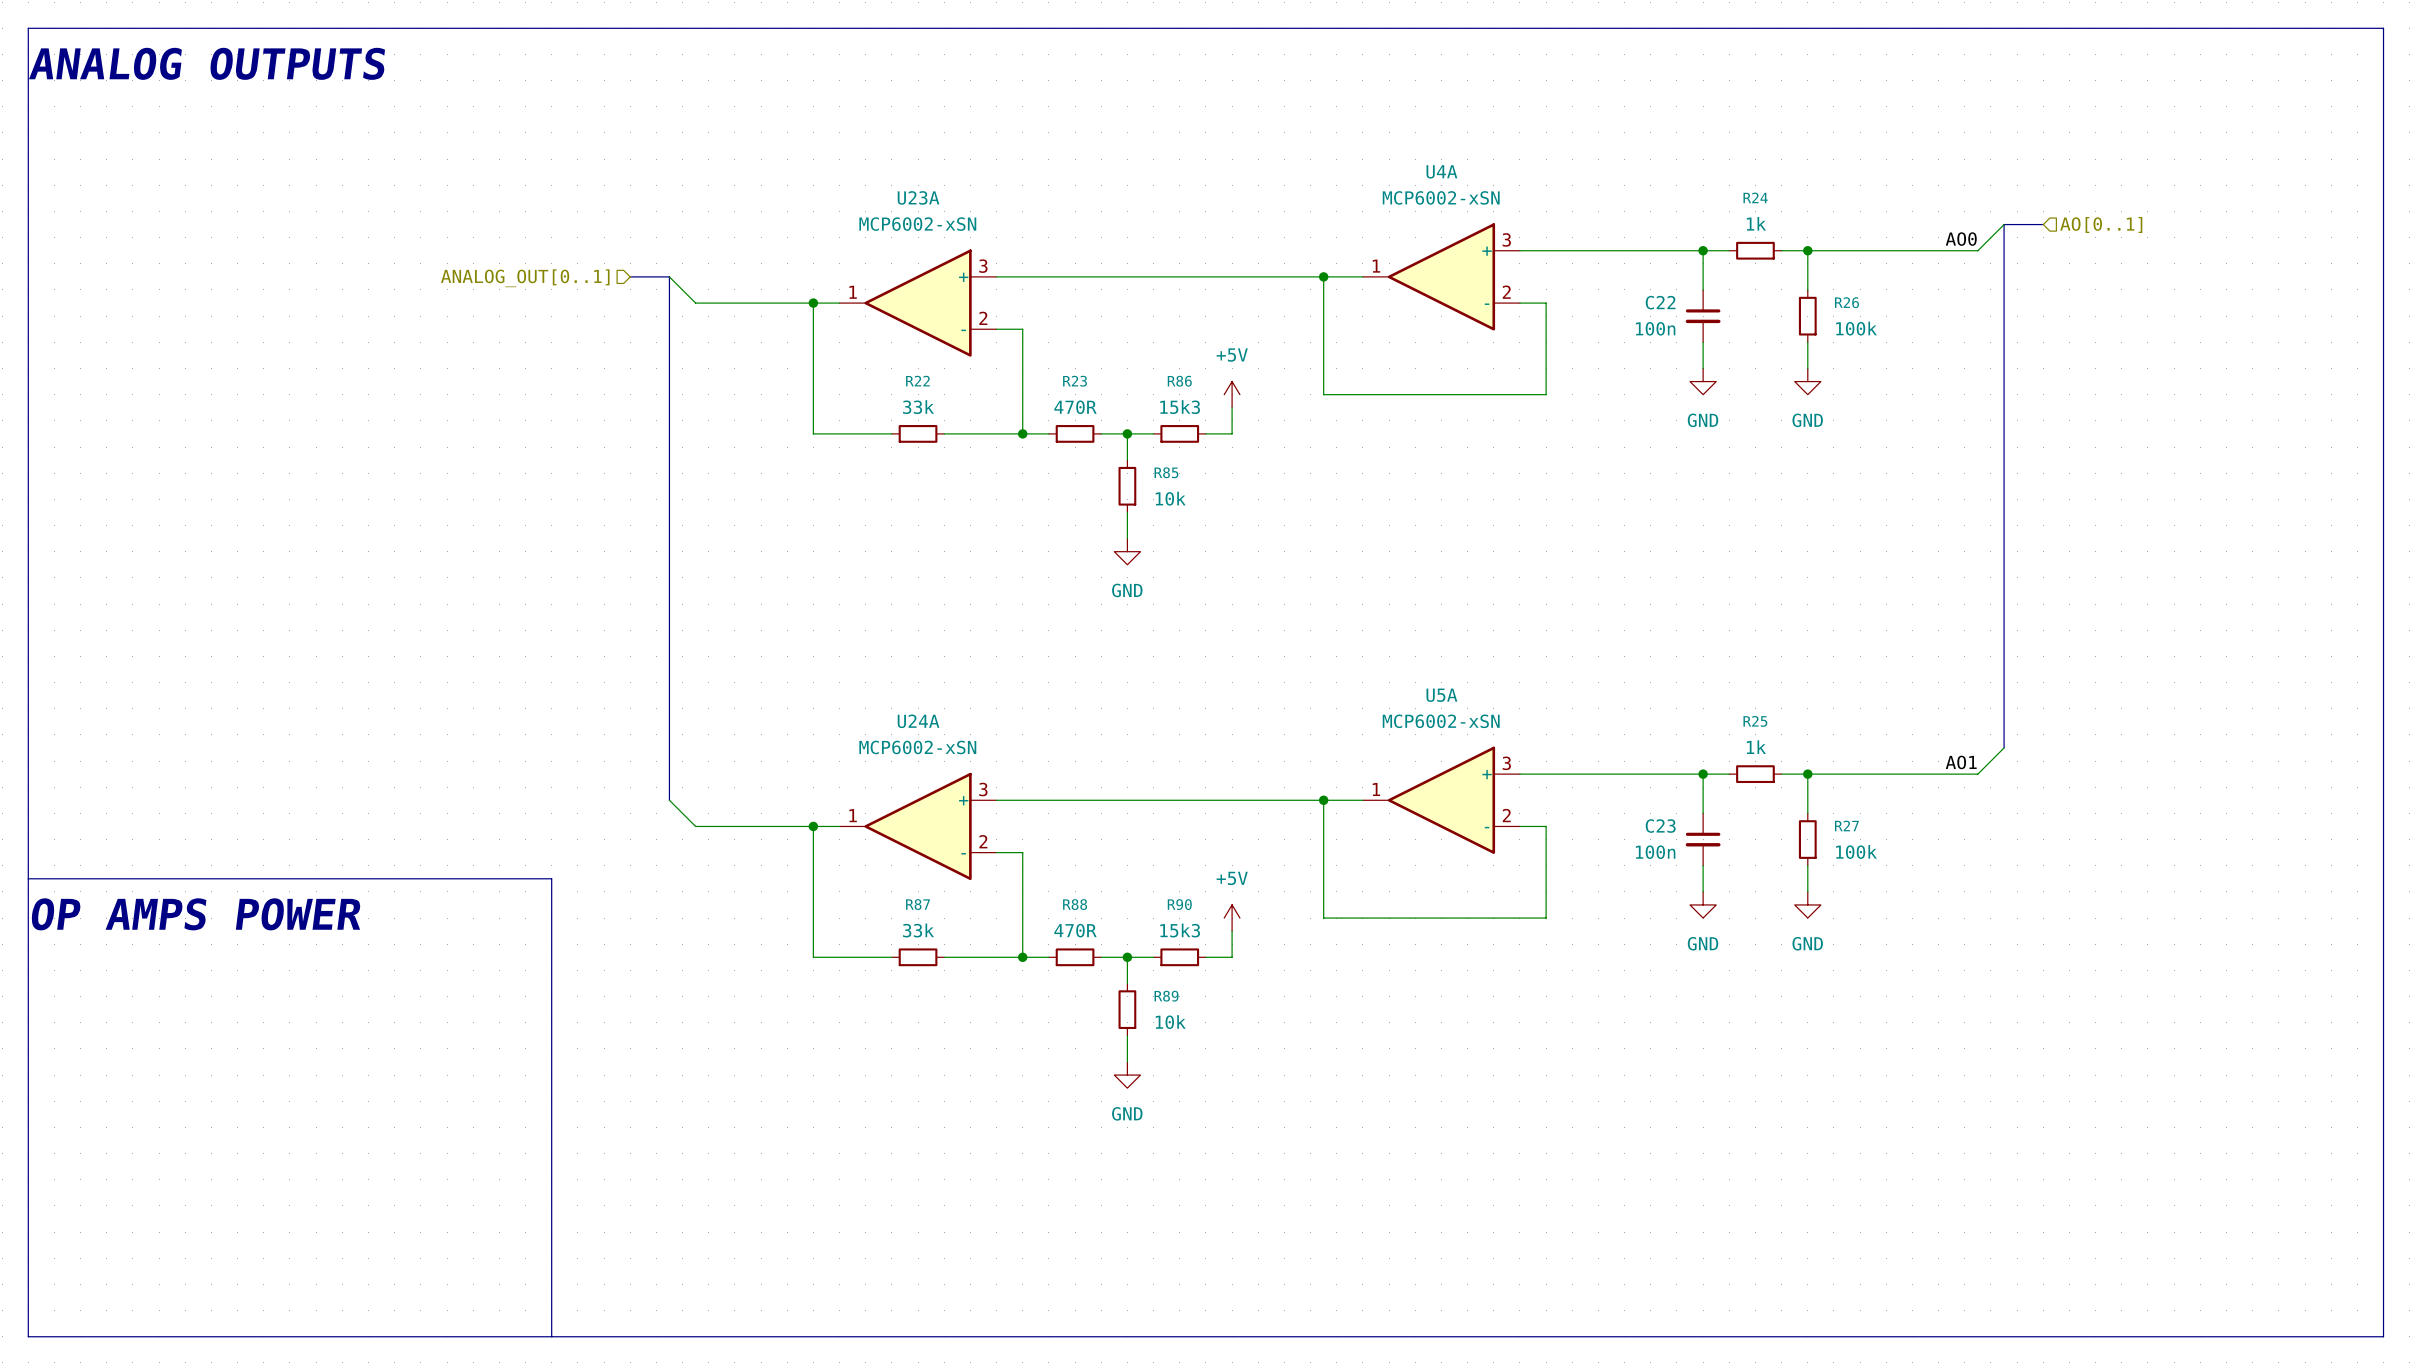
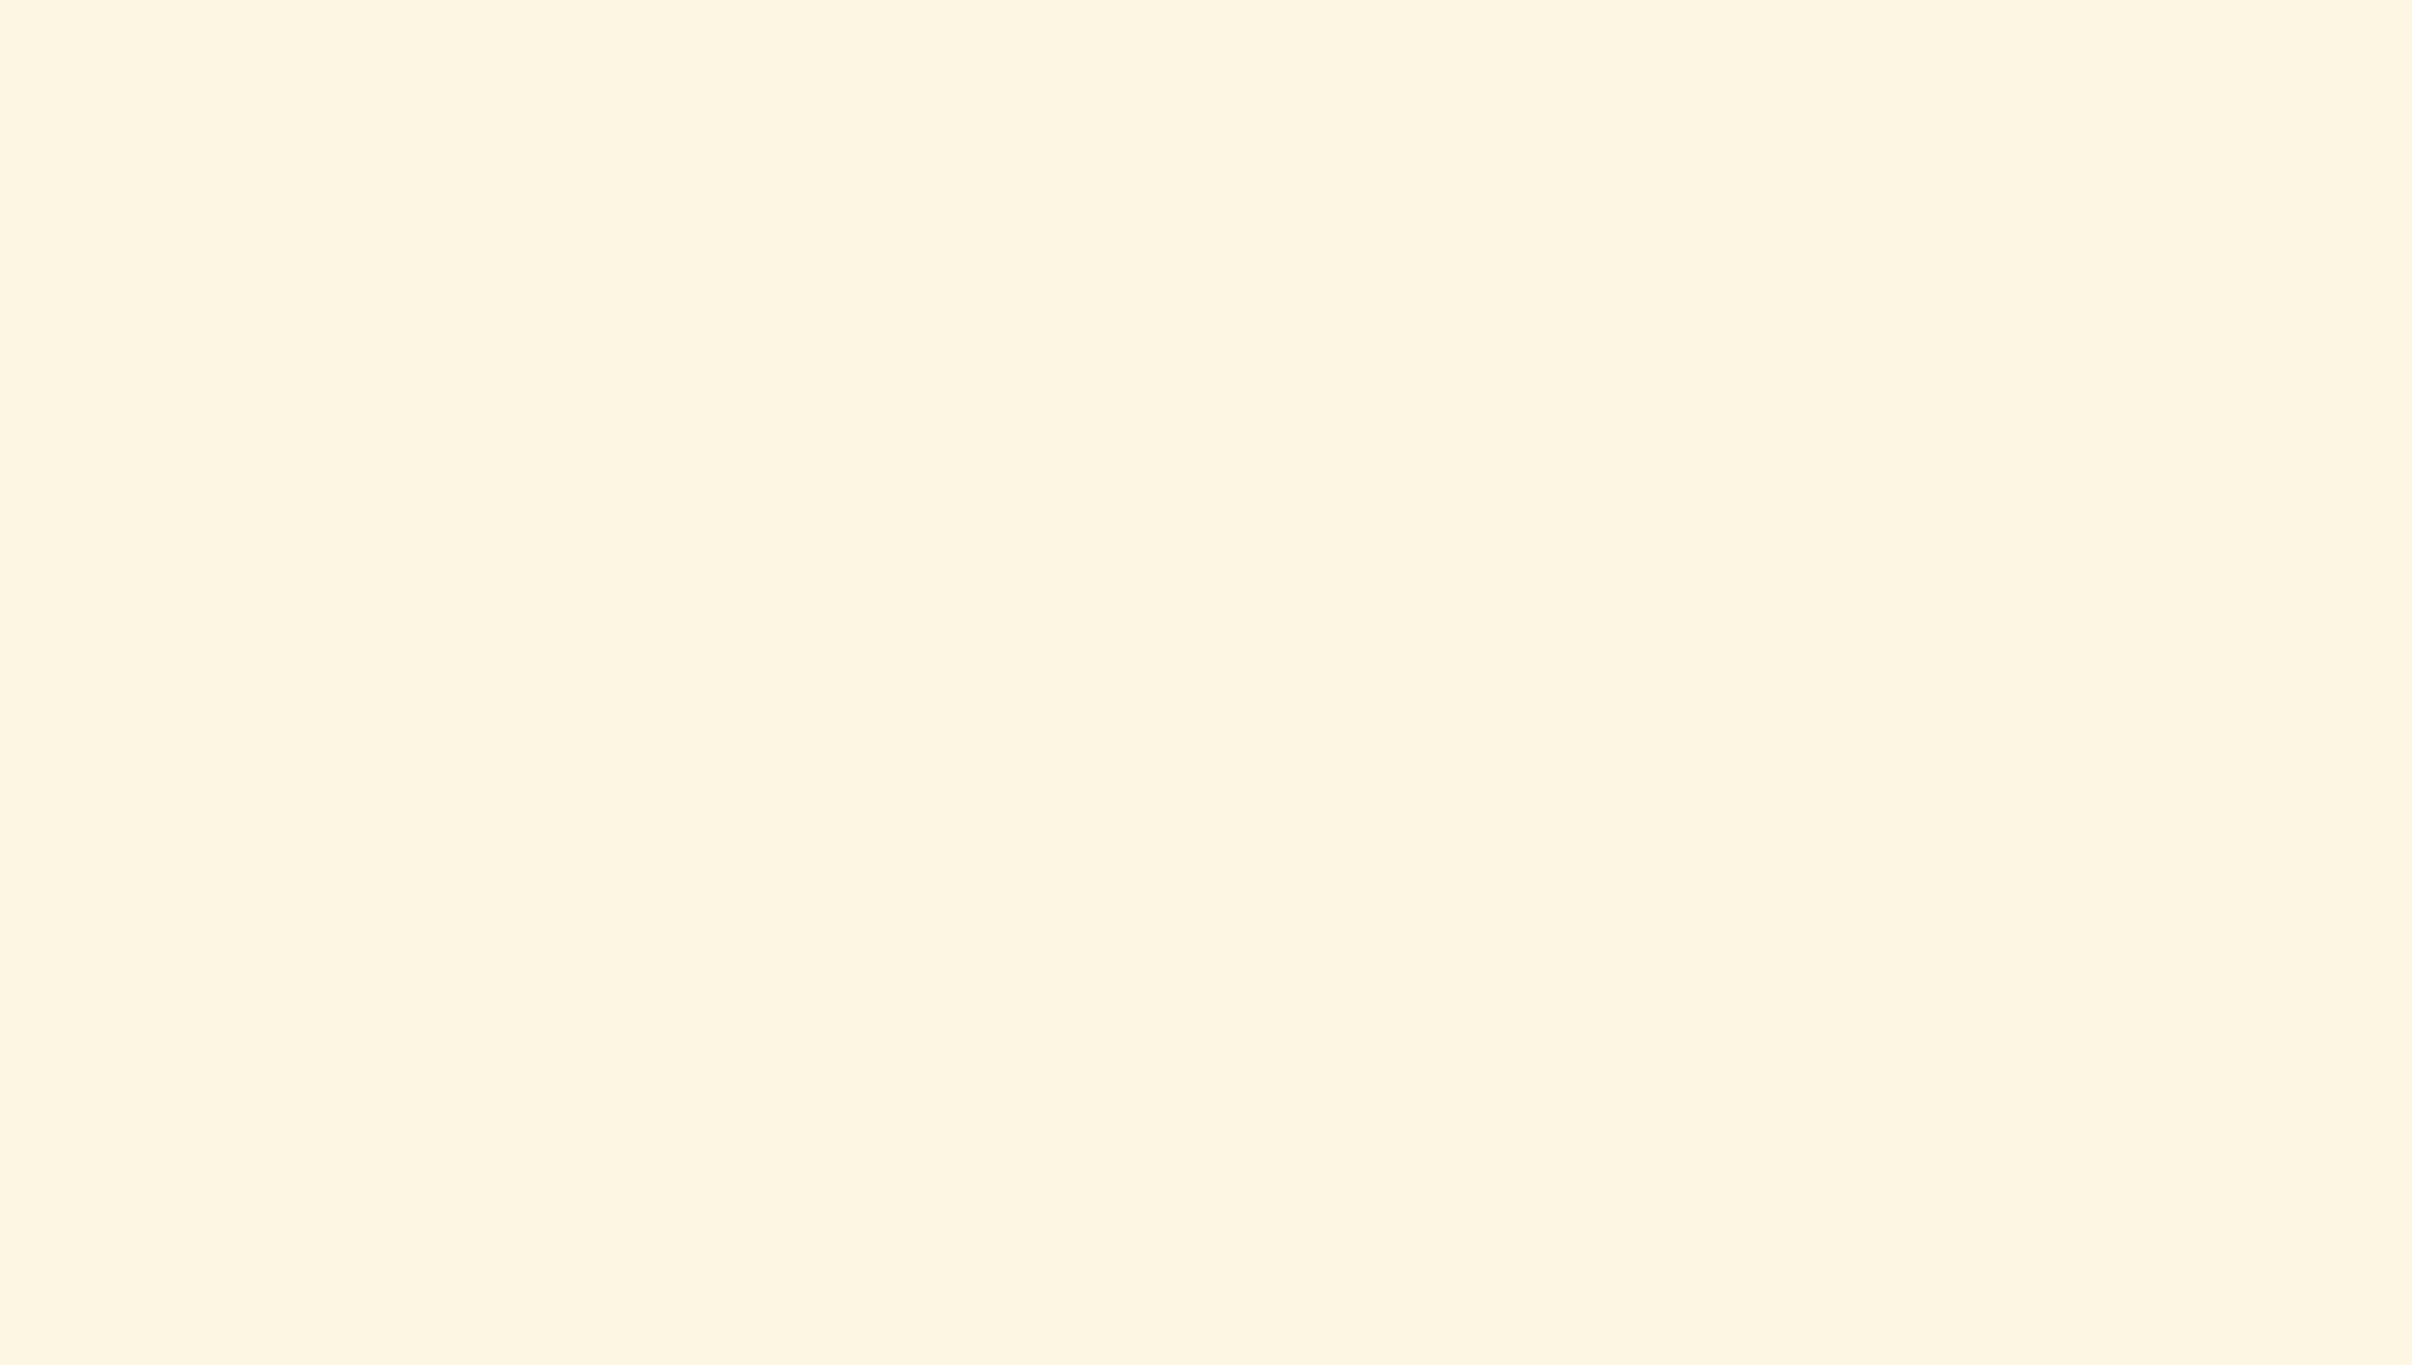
line: (28, 28) (2383, 28) (2383, 1336) (28, 1336) (28, 28) -> none
text: ANALOG OUTPUTS (207, 63) -> none
wire: (2004, 224) (1977, 250) (1781, 250) -> none
bus: (2043, 224) (2004, 224) (2004, 747) -> none
hierarchical label: AO[0..1] (2101, 224) -> none
label: AO0 (1961, 239) -> none
wire: (1519, 250) (1729, 250) -> none
wire: (1703, 250) (1703, 289) -> none
junction: (1703, 250) -> none
R24: 1k (1755, 250) -> none
wire: (1807, 250) (1807, 289) -> none
junction: (1807, 250) -> none
bus: (630, 276) (669, 276) (669, 800) -> none
wire: (669, 276) (695, 303) (839, 303) -> none
wire: (996, 276) (1362, 276) -> none
wire: (1323, 276) (1323, 394) (1546, 394) (1546, 303) (1519, 303) -> none
junction: (1323, 276) -> none
U4A: MCP6002-xSN (1441, 276) -> none
hierarchical label: ANALOG_OUT[0..1] (525, 278) -> none
wire: (813, 303) (813, 433) (891, 433) -> none
junction: (813, 303) -> none
U23A: MCP6002-xSN (918, 303) -> none
C22: 100n (1703, 316) -> none
R26: 100k (1807, 316) -> none
wire: (996, 329) (1022, 329) (1022, 433) -> none
wire: (1703, 342) (1703, 368) -> none
wire: (1807, 342) (1807, 368) -> none
power symbol: GND (1703, 381) -> none
power symbol: GND (1807, 381) -> none
power symbol: +5V (1232, 394) -> none
wire: (1232, 407) (1232, 433) (1205, 433) -> none
R22: 33k (918, 433) -> none
wire: (944, 433) (1048, 433) -> none
junction: (1022, 433) -> none
R23: 470R (1075, 433) -> none
wire: (1101, 433) (1153, 433) -> none
wire: (1127, 433) (1127, 460) -> none
junction: (1127, 433) -> none
R86: 15k3 (1179, 433) -> none
R85: 10k (1127, 486) -> none
wire: (1127, 512) (1127, 538) -> none
power symbol: GND (1127, 551) -> none
wire: (2004, 747) (1977, 774) (1781, 774) -> none
label: AO1 (1961, 762) -> none
wire: (1519, 774) (1729, 774) -> none
wire: (1703, 774) (1703, 813) -> none
junction: (1703, 774) -> none
R25: 1k (1755, 774) -> none
wire: (1807, 774) (1807, 813) -> none
junction: (1807, 774) -> none
wire: (669, 800) (695, 826) (839, 826) -> none
wire: (996, 800) (1362, 800) -> none
wire: (1323, 800) (1323, 918) (1546, 918) (1546, 826) (1519, 826) -> none
junction: (1323, 800) -> none
U5A: MCP6002-xSN (1441, 800) -> none
wire: (813, 826) (813, 957) (891, 957) -> none
junction: (813, 826) -> none
U24A: MCP6002-xSN (918, 826) -> none
C23: 100n (1703, 839) -> none
R27: 100k (1807, 839) -> none
wire: (996, 852) (1022, 852) (1022, 957) -> none
wire: (1703, 865) (1703, 891) -> none
wire: (1807, 865) (1807, 891) -> none
line: (28, 878) (551, 878) (551, 1336) -> none
power symbol: GND (1703, 904) -> none
power symbol: GND (1807, 904) -> none
text: OP AMPS POWER (195, 914) -> none
power symbol: +5V (1232, 918) -> none
wire: (1232, 931) (1232, 957) (1205, 957) -> none
R87: 33k (918, 957) -> none
wire: (944, 957) (1048, 957) -> none
junction: (1022, 957) -> none
R88: 470R (1075, 957) -> none
wire: (1101, 957) (1153, 957) -> none
wire: (1127, 957) (1127, 983) -> none
junction: (1127, 957) -> none
R90: 15k3 (1179, 957) -> none
R89: 10k (1127, 1009) -> none
wire: (1127, 1035) (1127, 1061) -> none
power symbol: GND (1127, 1075) -> none

